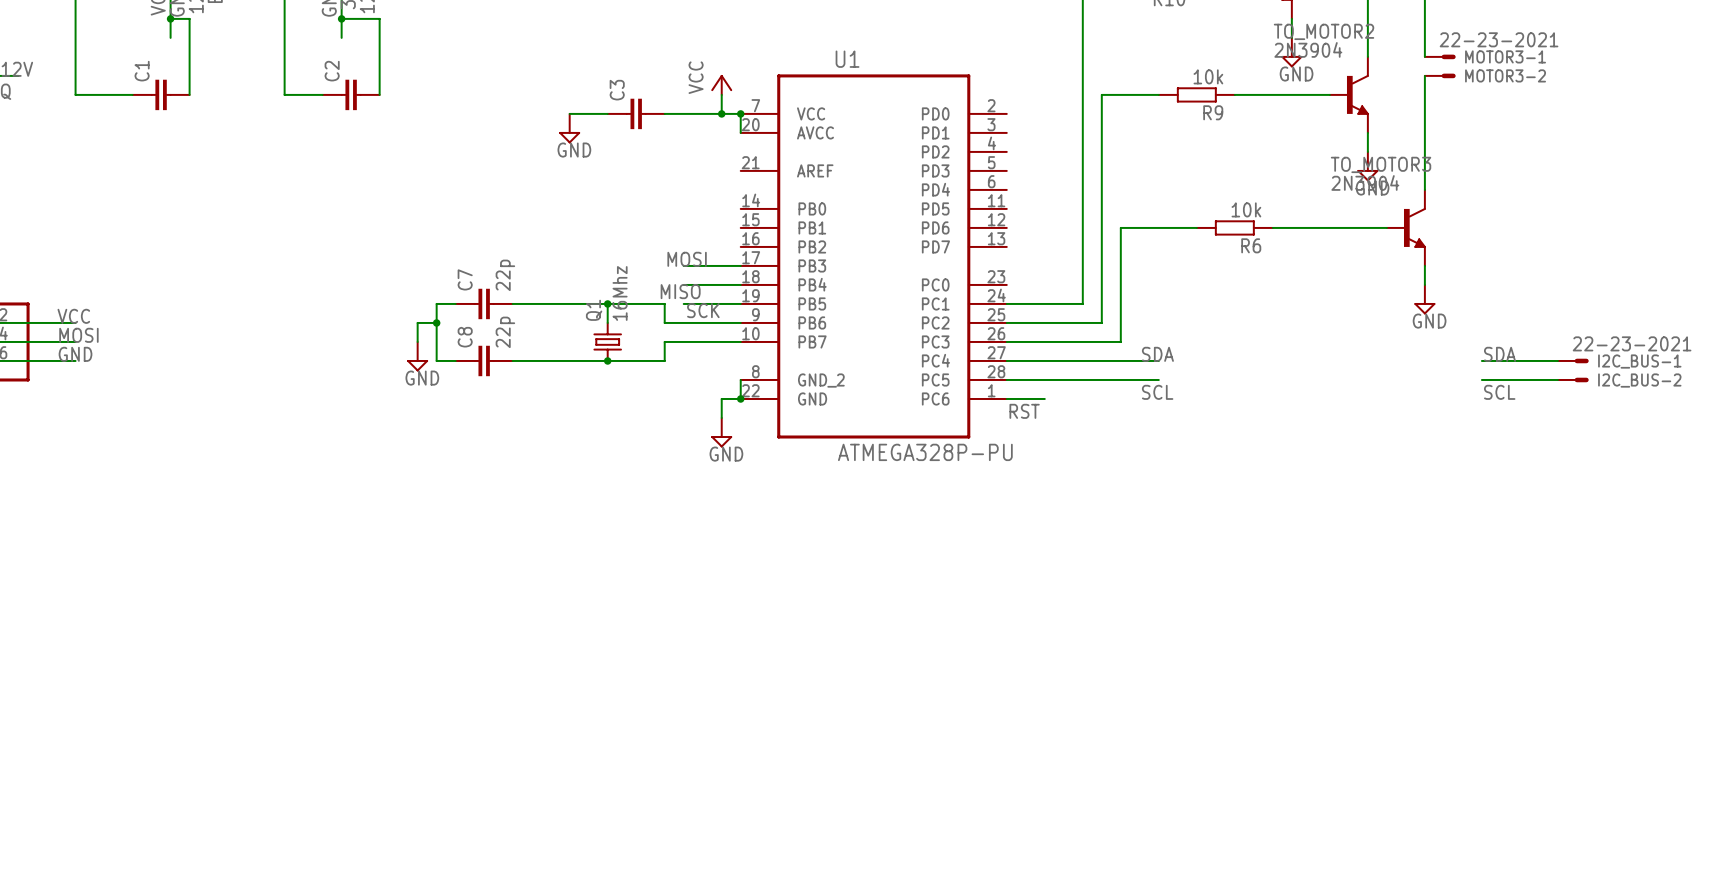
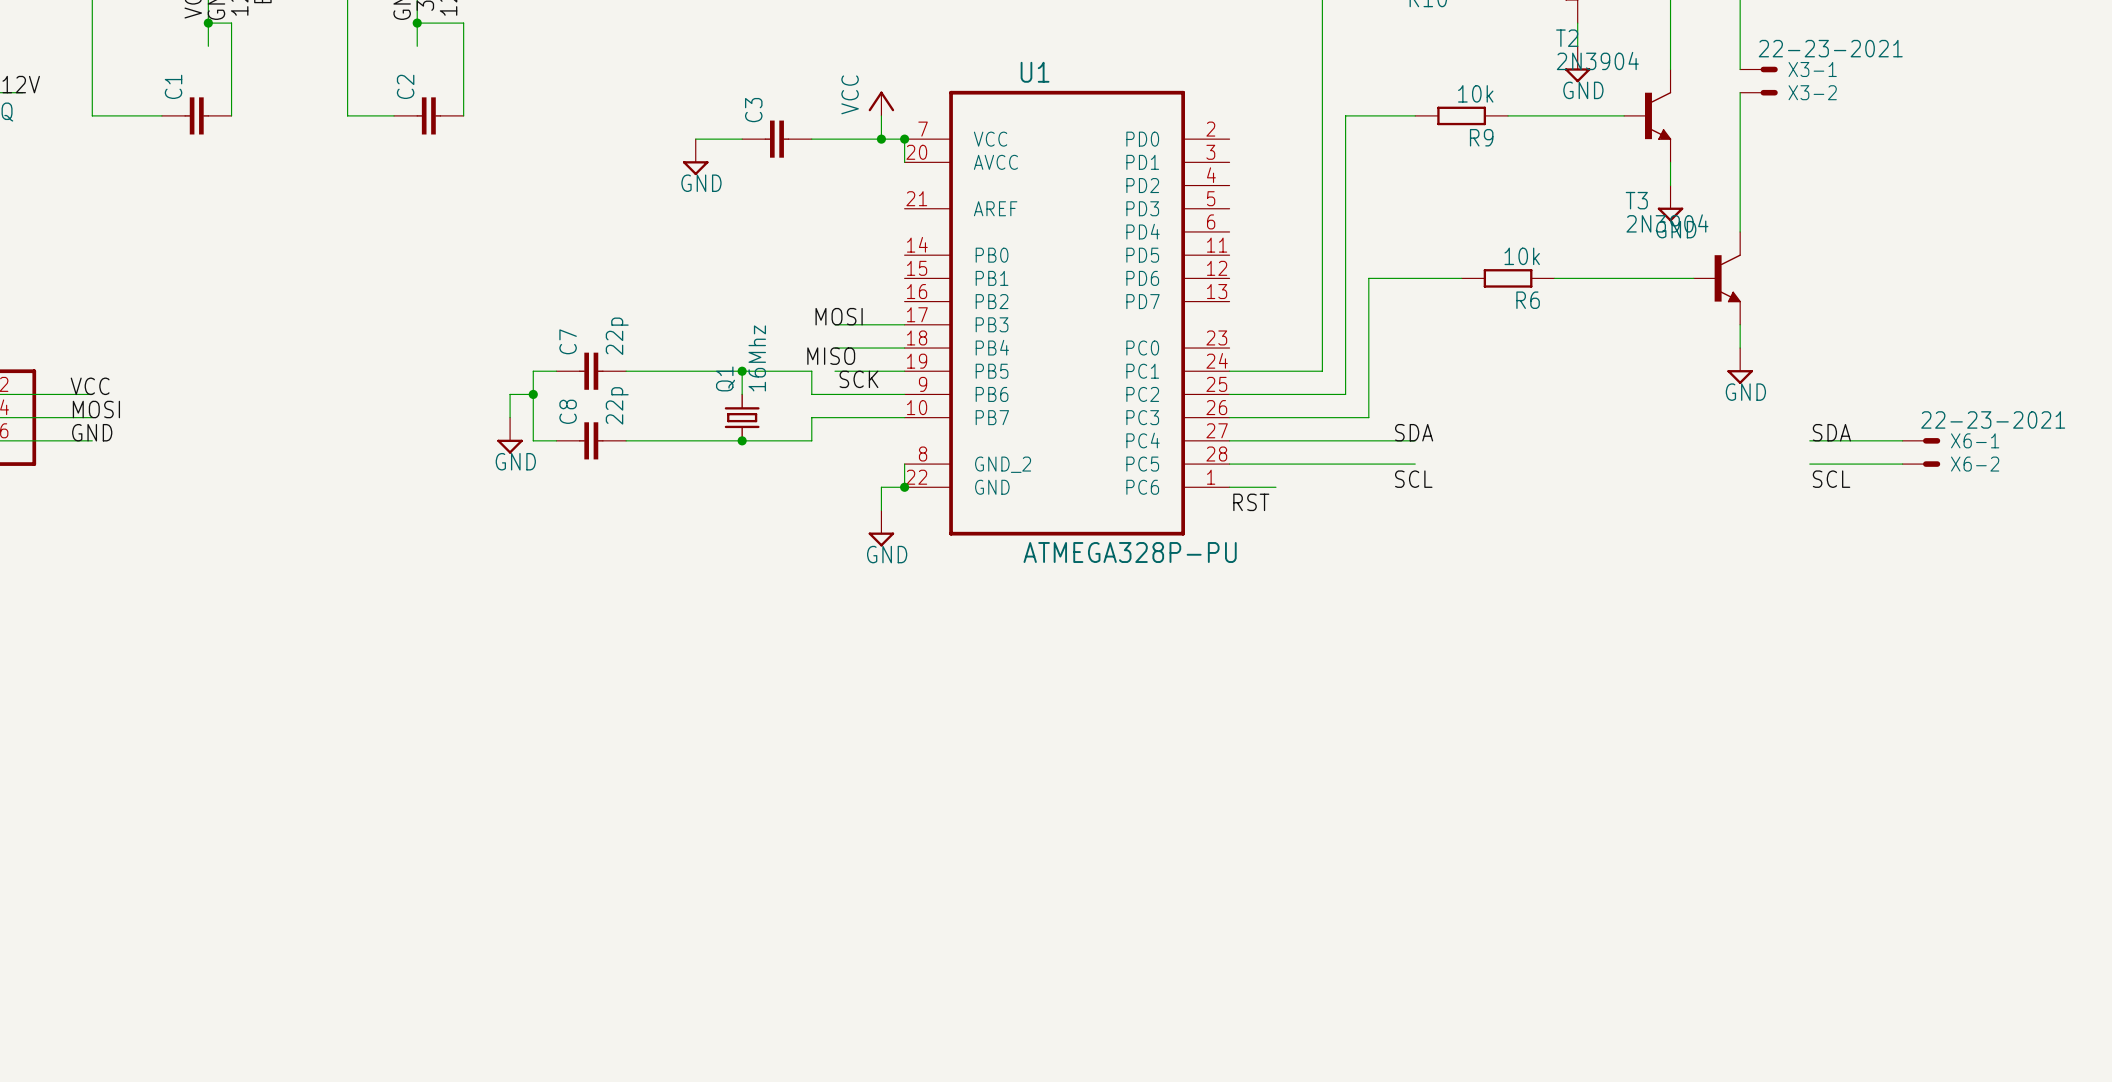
TO_MOTOR2 name: TO_MOTOR2 (1324, 31) -> T2 (1567, 38)
MOTOR3-1 name: MOTOR3-1 (1505, 56) -> X3-1 (1812, 69)
MOTOR3-2 name: MOTOR3-2 (1505, 75) -> X3-2 (1812, 92)
TO_MOTOR3 name: TO_MOTOR3 (1381, 164) -> T3 (1636, 200)
I2C_BUS-1 name: I2C_BUS-1 (1639, 361) -> X6-1 (1975, 440)
I2C_BUS-2 name: I2C_BUS-2 (1639, 380) -> X6-2 (1975, 464)

